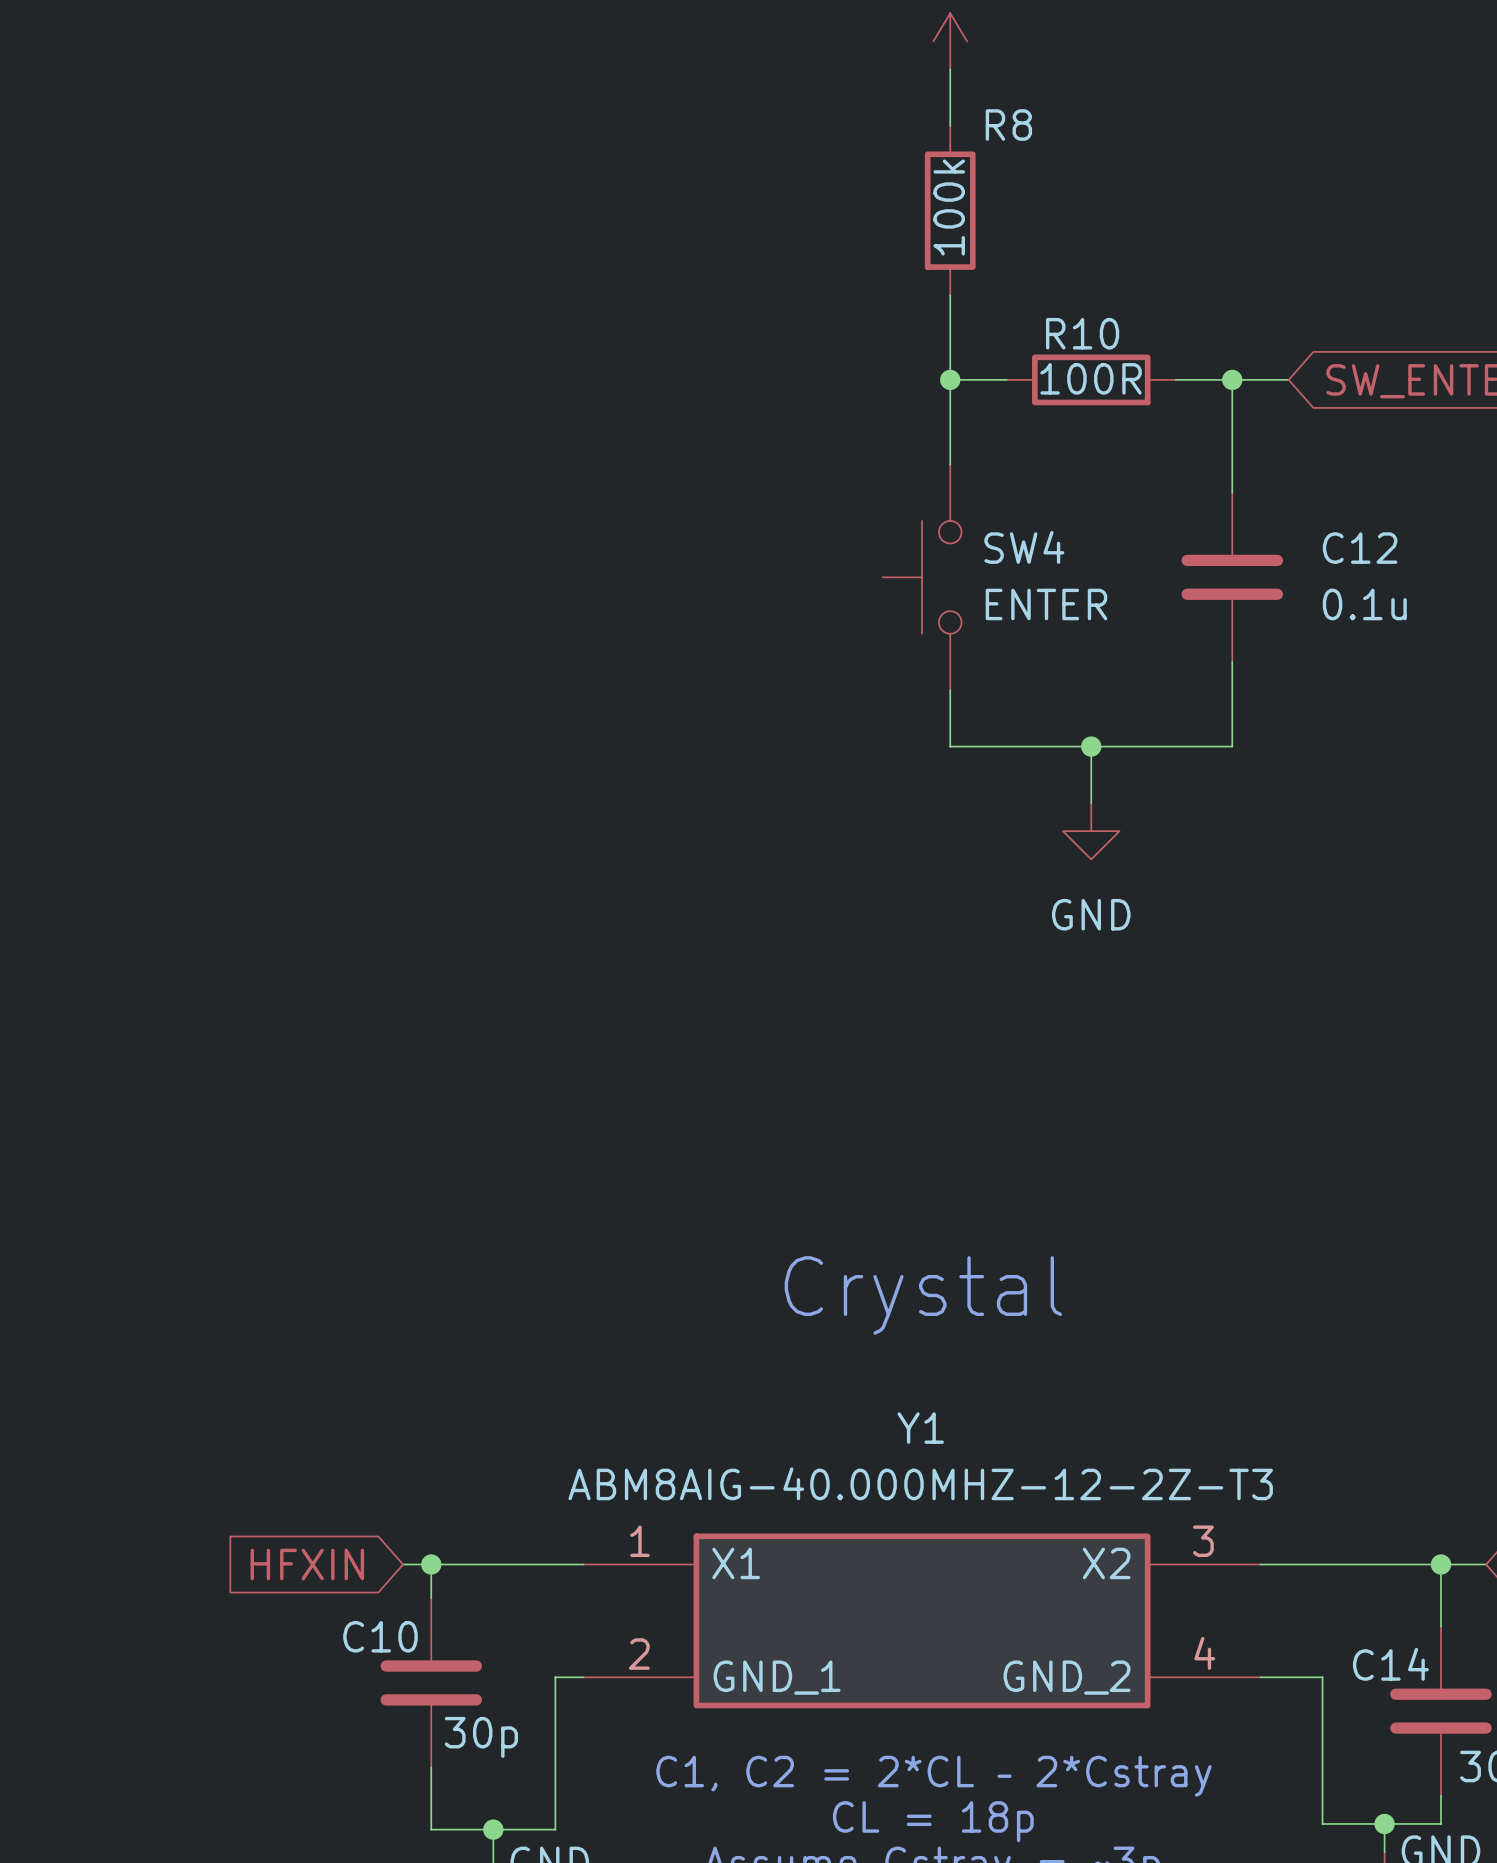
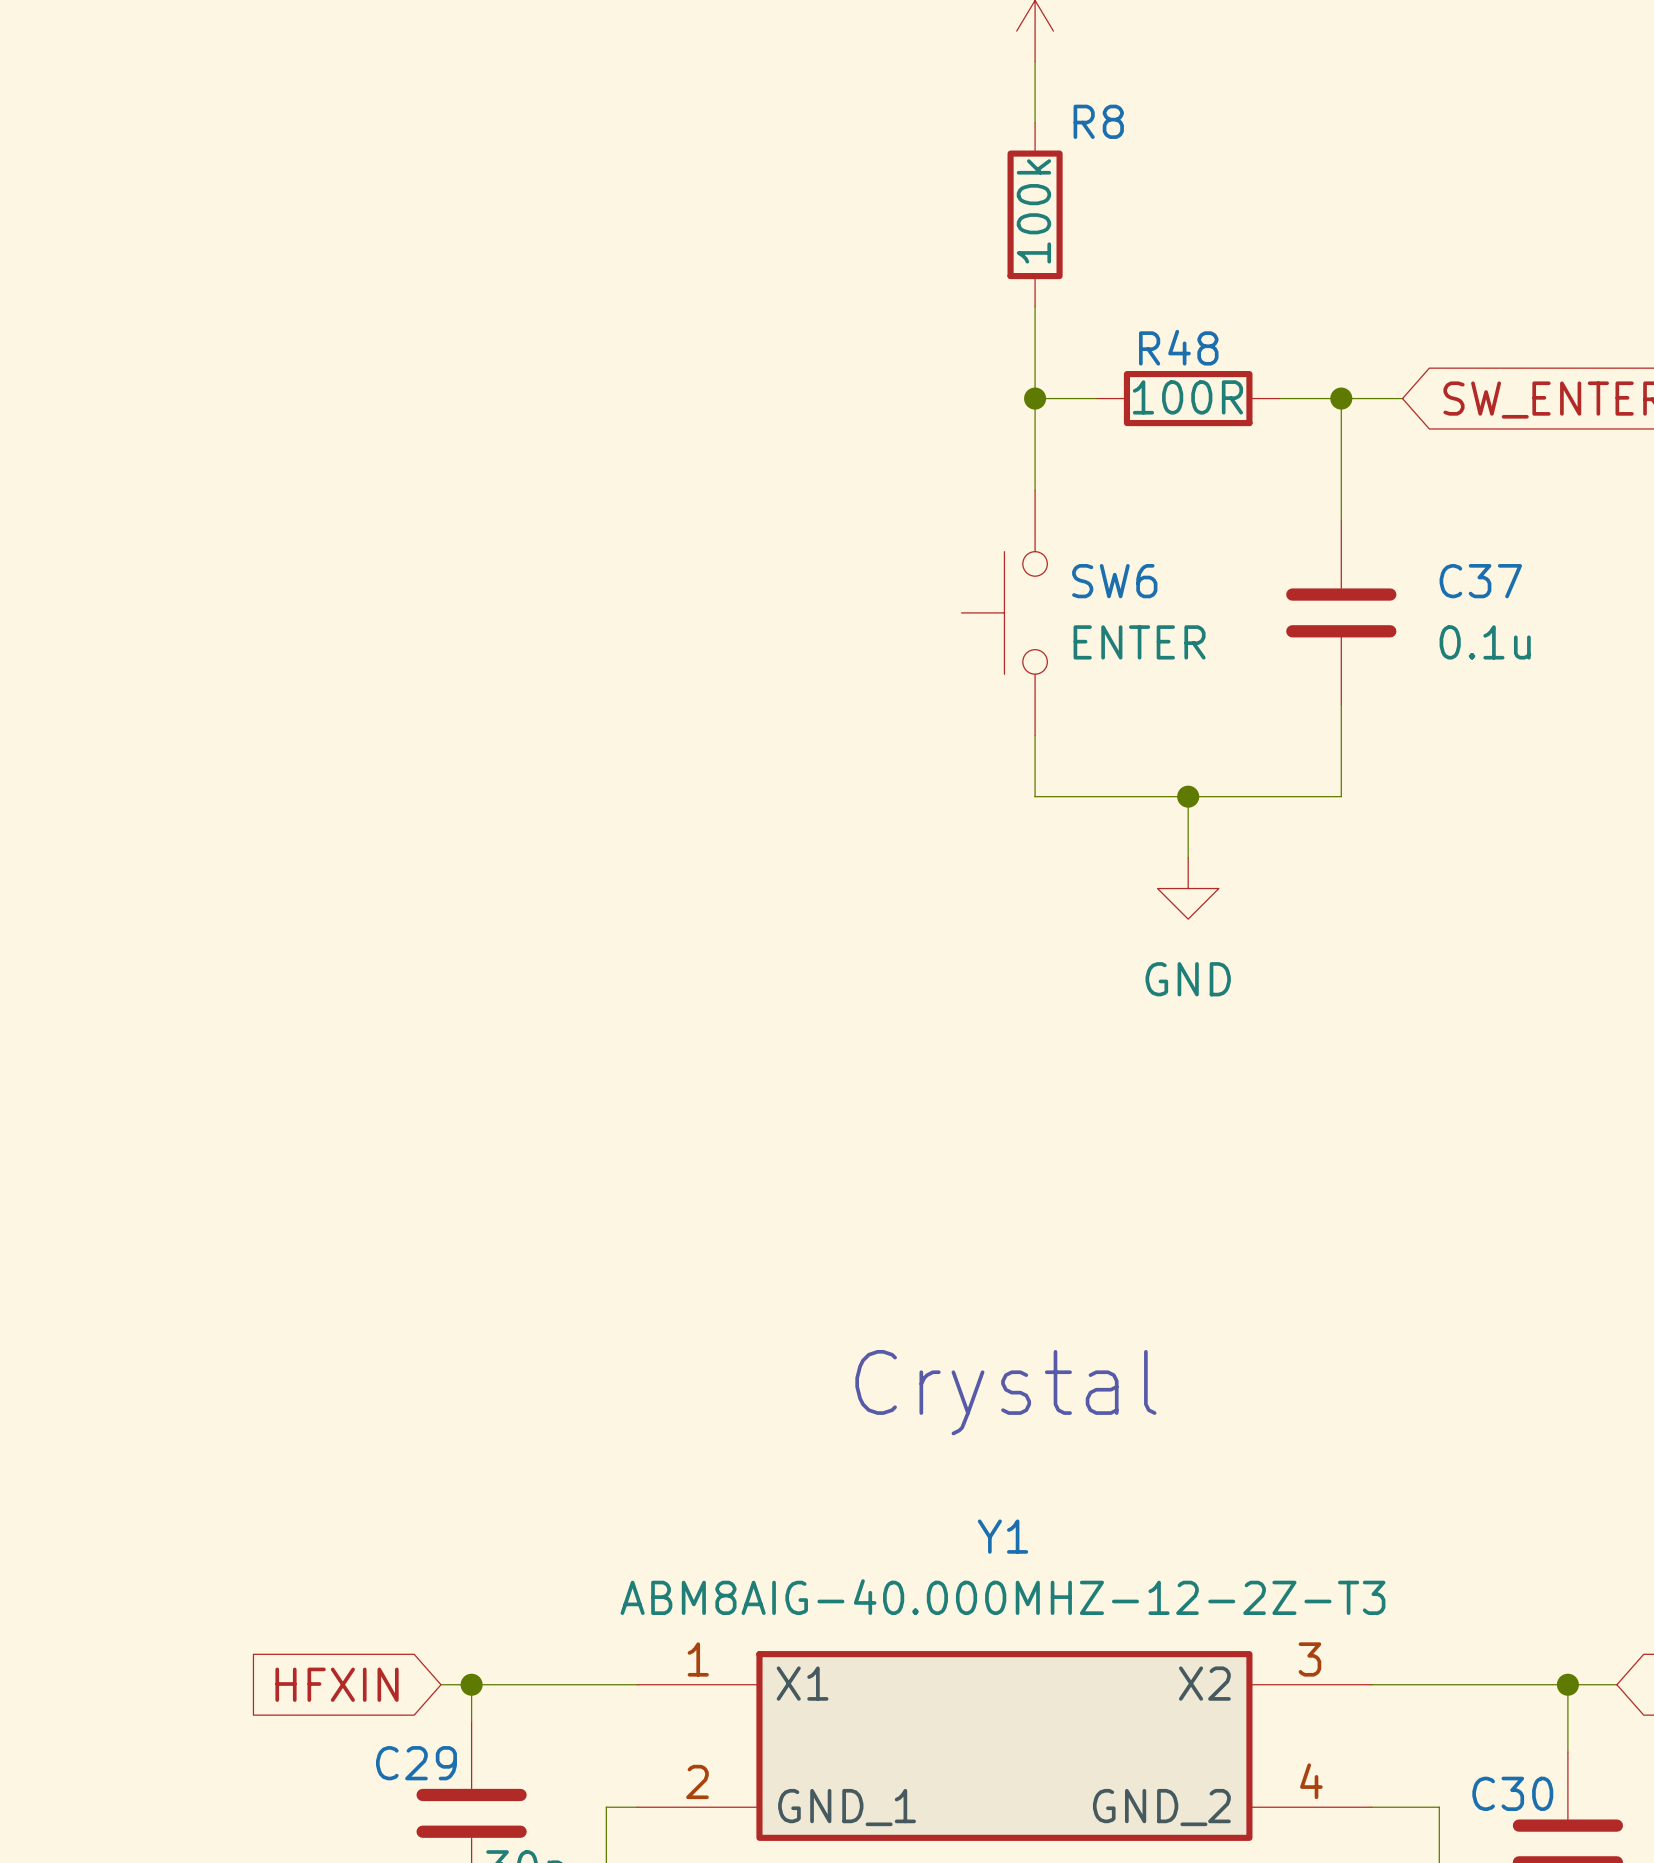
R10 name: R10 (1082, 333) -> R48 (1178, 347)
SW4 name: SW4 (1024, 547) -> SW6 (1114, 581)
C12 name: C12 (1360, 548) -> C37 (1480, 581)
C10 name: C10 (380, 1636) -> C29 (416, 1763)
C14 name: C14 (1390, 1664) -> C30 (1512, 1793)

